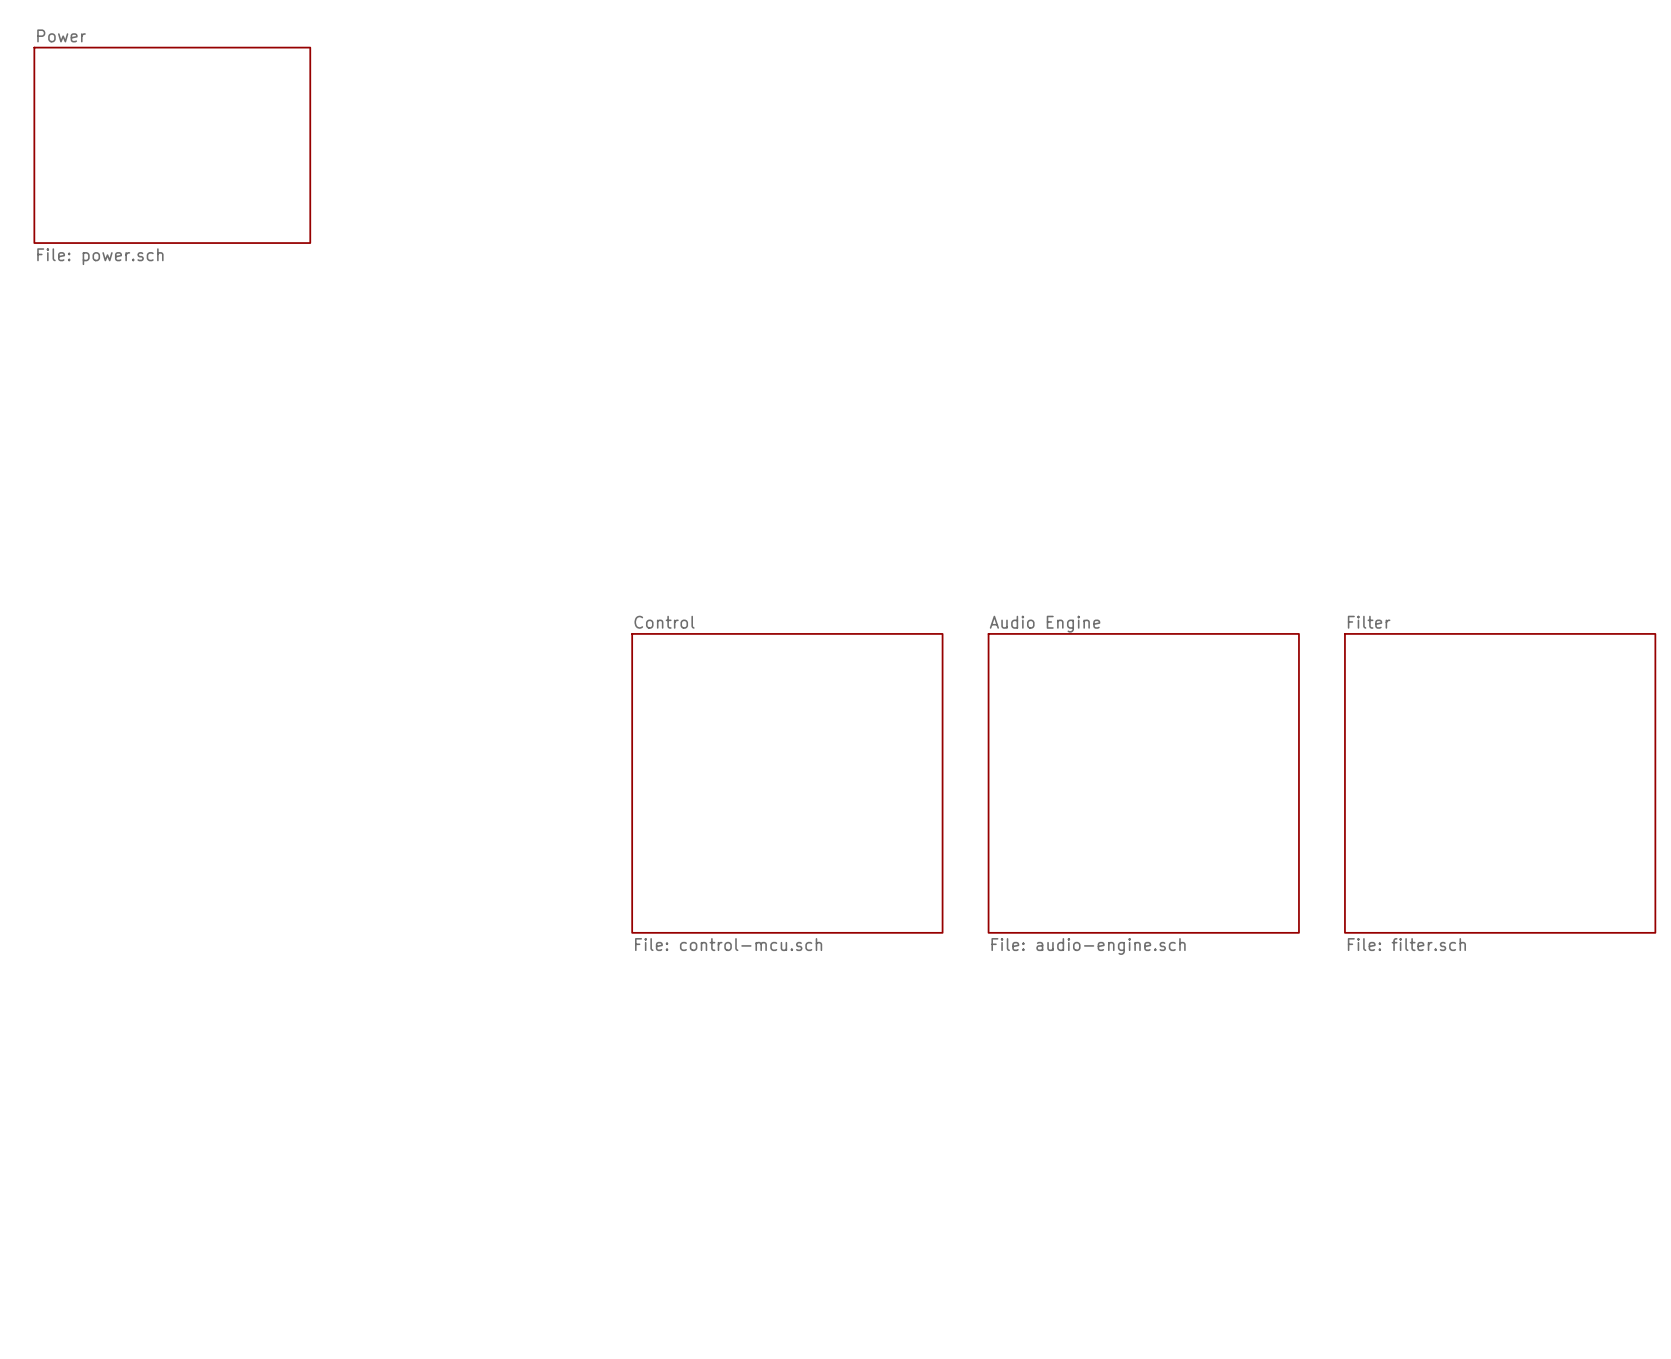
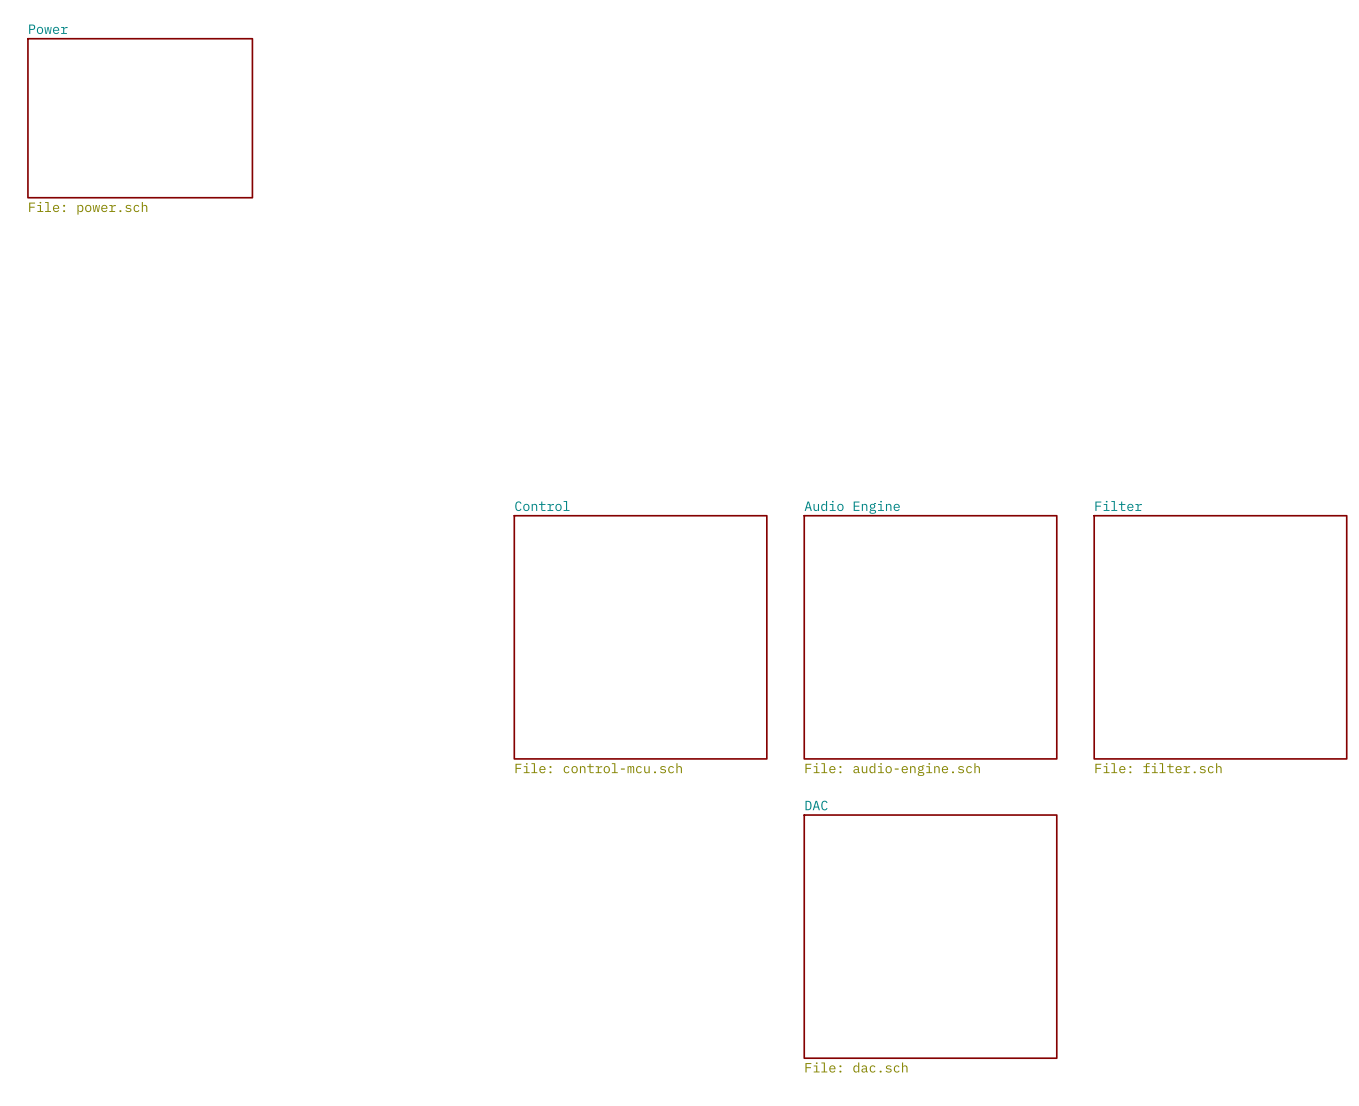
sheet DAC: none -> File: dac.sch (930, 936)

